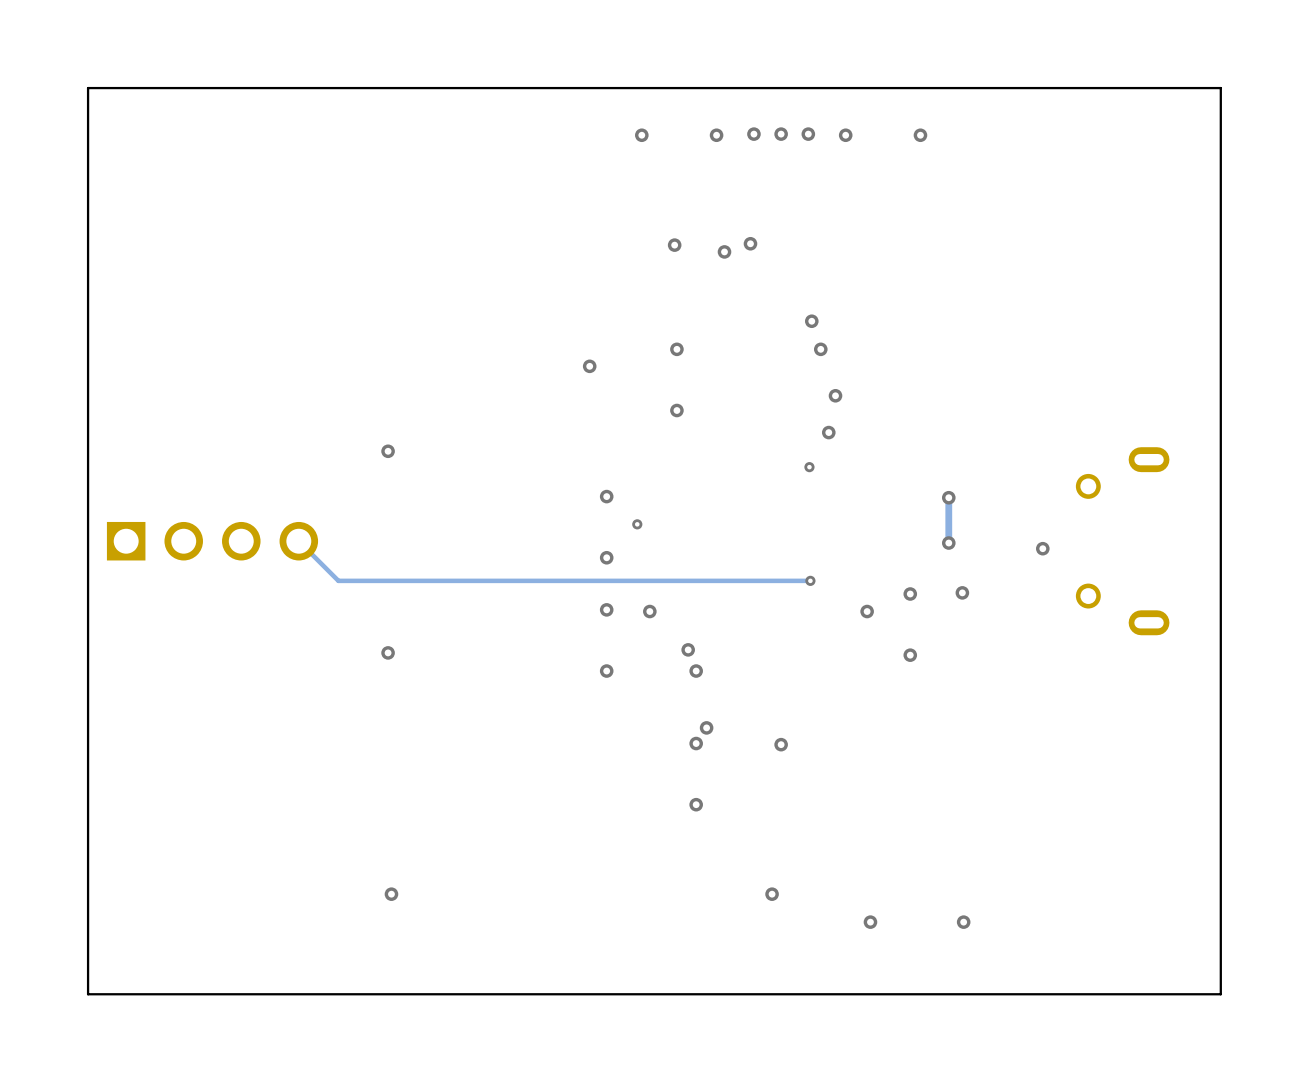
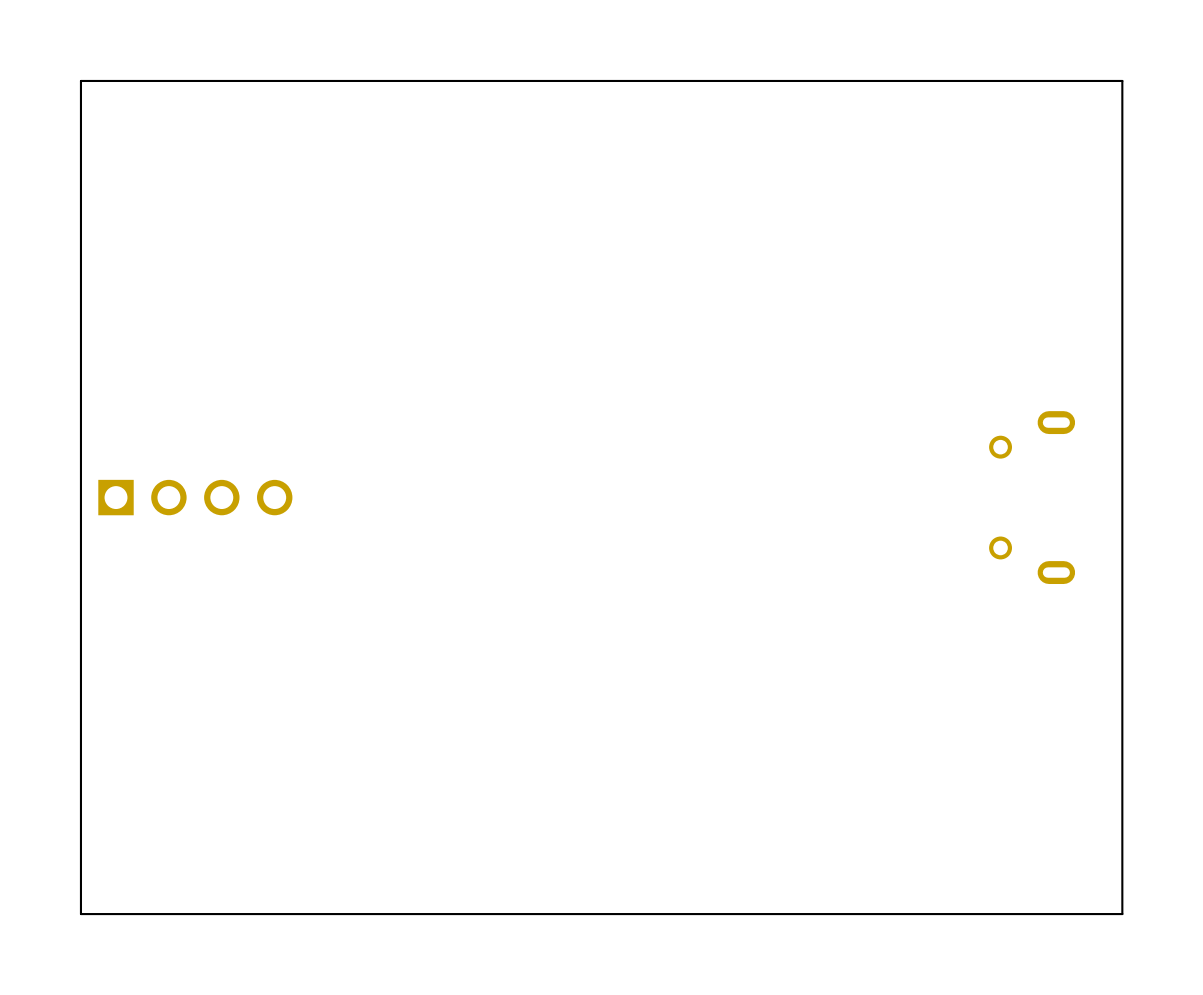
via: (753, 134) -> none
via: (781, 134) -> none
via: (808, 134) -> none
via: (641, 135) -> none
via: (716, 135) -> none
via: (845, 135) -> none
via: (920, 135) -> none
via: (750, 243) -> none
via: (674, 245) -> none
via: (724, 251) -> none
via: (811, 321) -> none
via: (676, 349) -> none
via: (820, 349) -> none
via: (589, 366) -> none
via: (835, 395) -> none
via: (676, 410) -> none
via: (828, 432) -> none
via: (388, 451) -> none
via: (809, 467) -> none
via: (606, 496) -> none
track: (948, 497) (948, 543) -> none
via: (948, 497) -> none
via: (637, 524) -> none
track: (298, 541) (338, 580) (810, 580) -> none
via: (948, 543) -> none
via: (1042, 548) -> none
via: (606, 557) -> none
via: (810, 580) -> none
via: (962, 592) -> none
via: (910, 594) -> none
via: (606, 609) -> none
via: (649, 611) -> none
via: (867, 611) -> none
via: (688, 649) -> none
via: (388, 652) -> none
via: (910, 655) -> none
via: (606, 671) -> none
via: (696, 671) -> none
via: (706, 727) -> none
via: (696, 743) -> none
via: (781, 744) -> none
via: (696, 804) -> none
via: (391, 894) -> none
via: (772, 894) -> none
via: (870, 922) -> none
via: (963, 922) -> none

